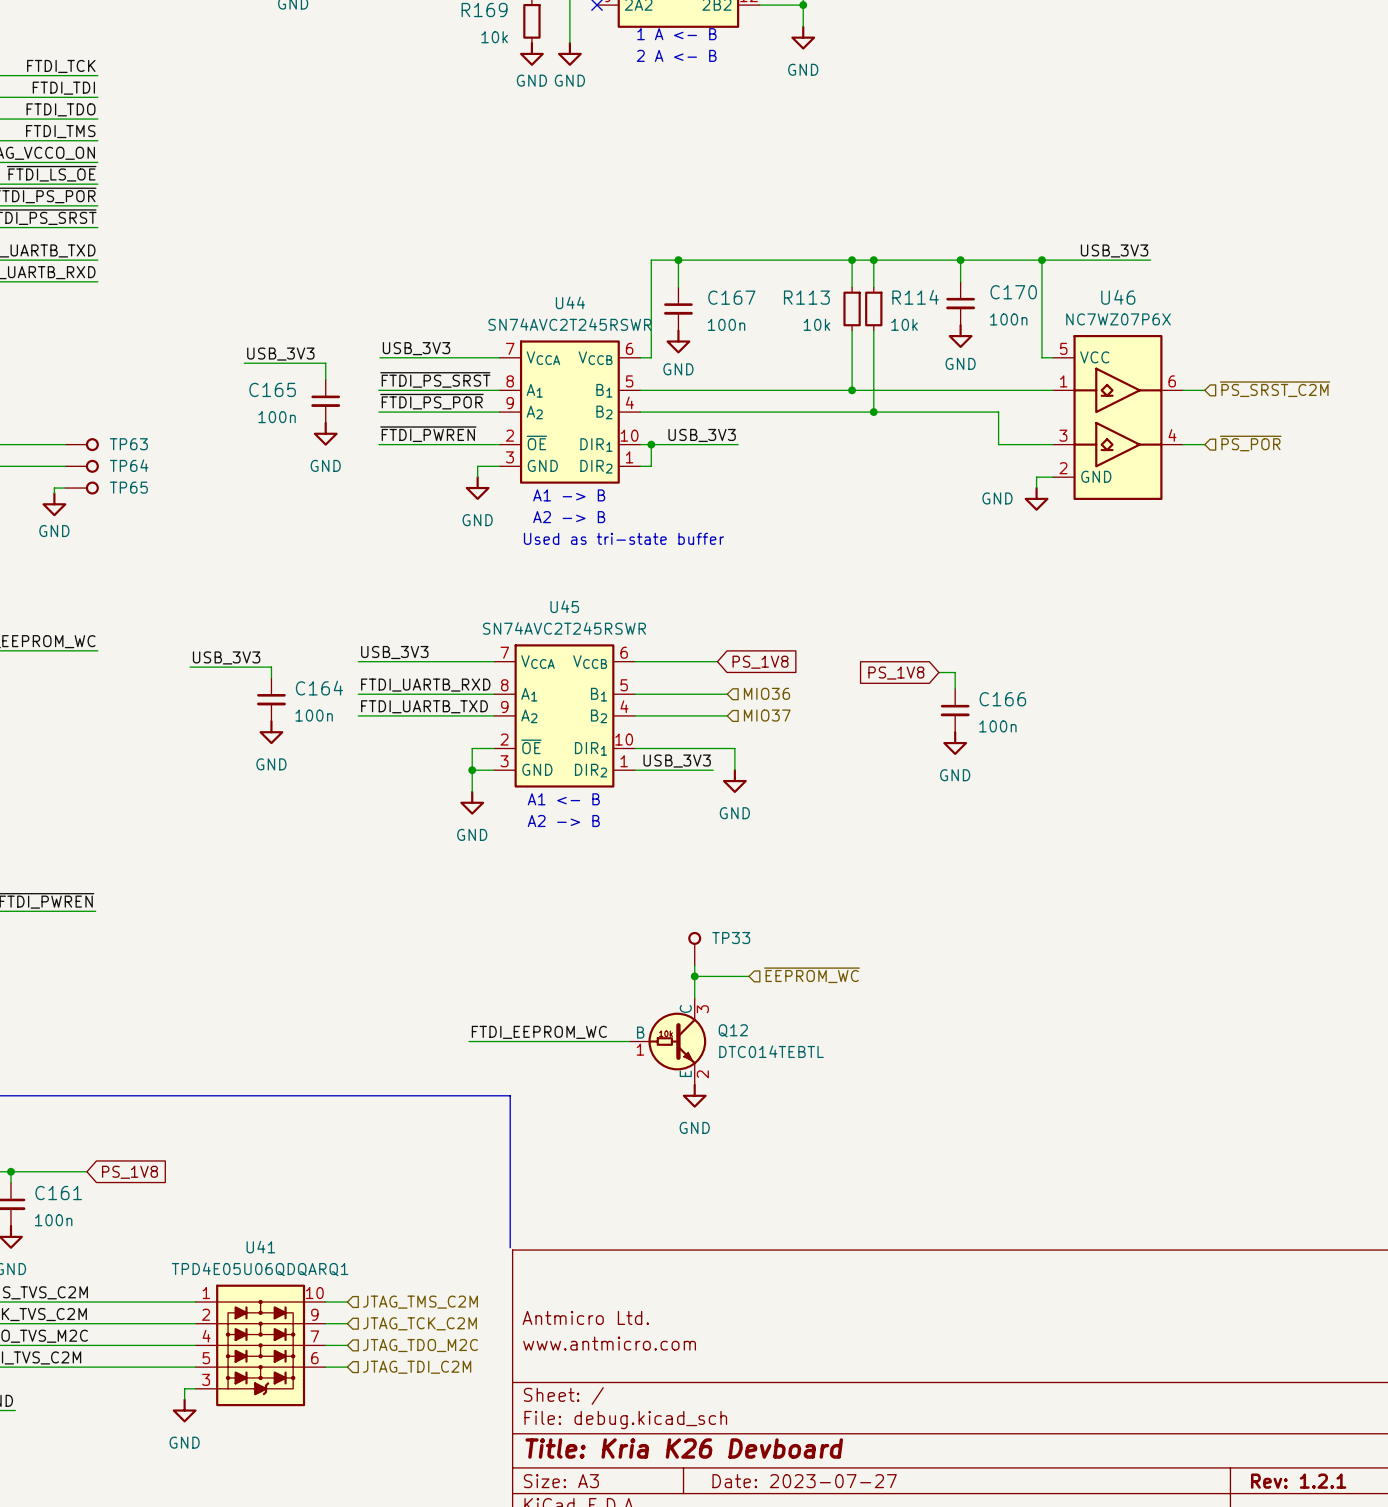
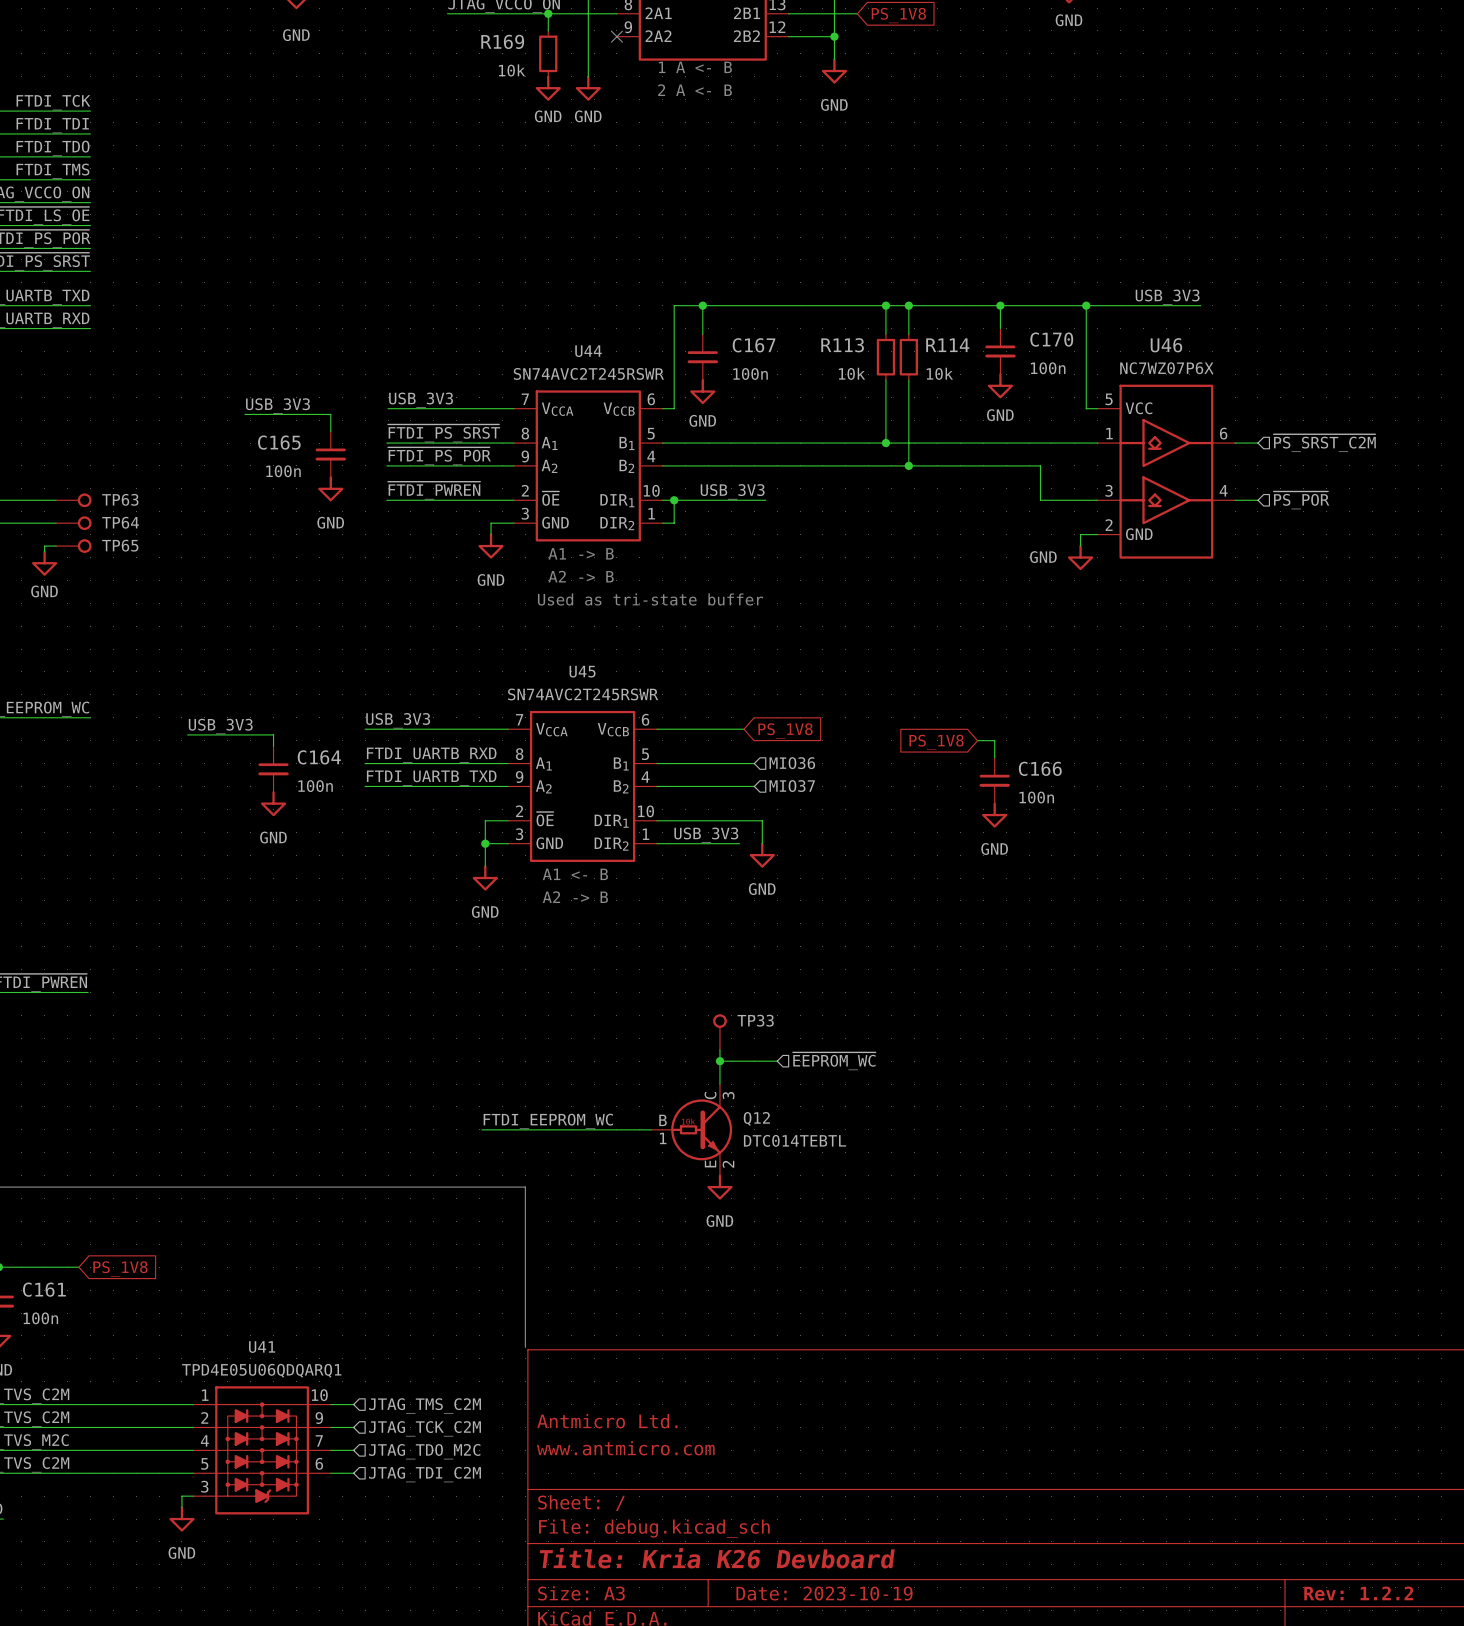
title block: Date: 2023-07-27 (804, 1481) -> Date: 2023-10-19 (824, 1593)
title block: Rev: 1.2.1 (1298, 1481) -> Rev: 1.2.2 (1358, 1593)

